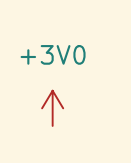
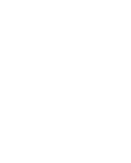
power symbol: +3V0 (52, 108) -> none

